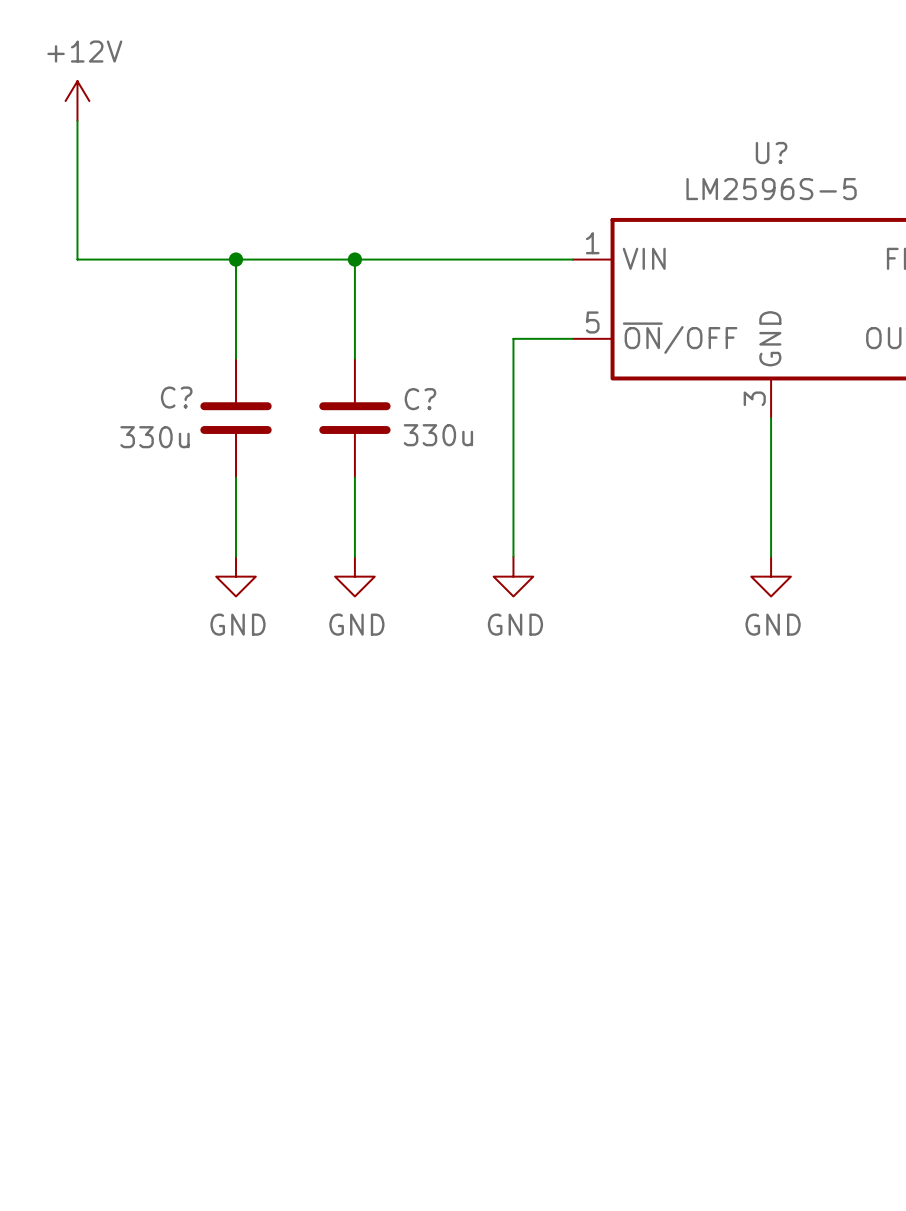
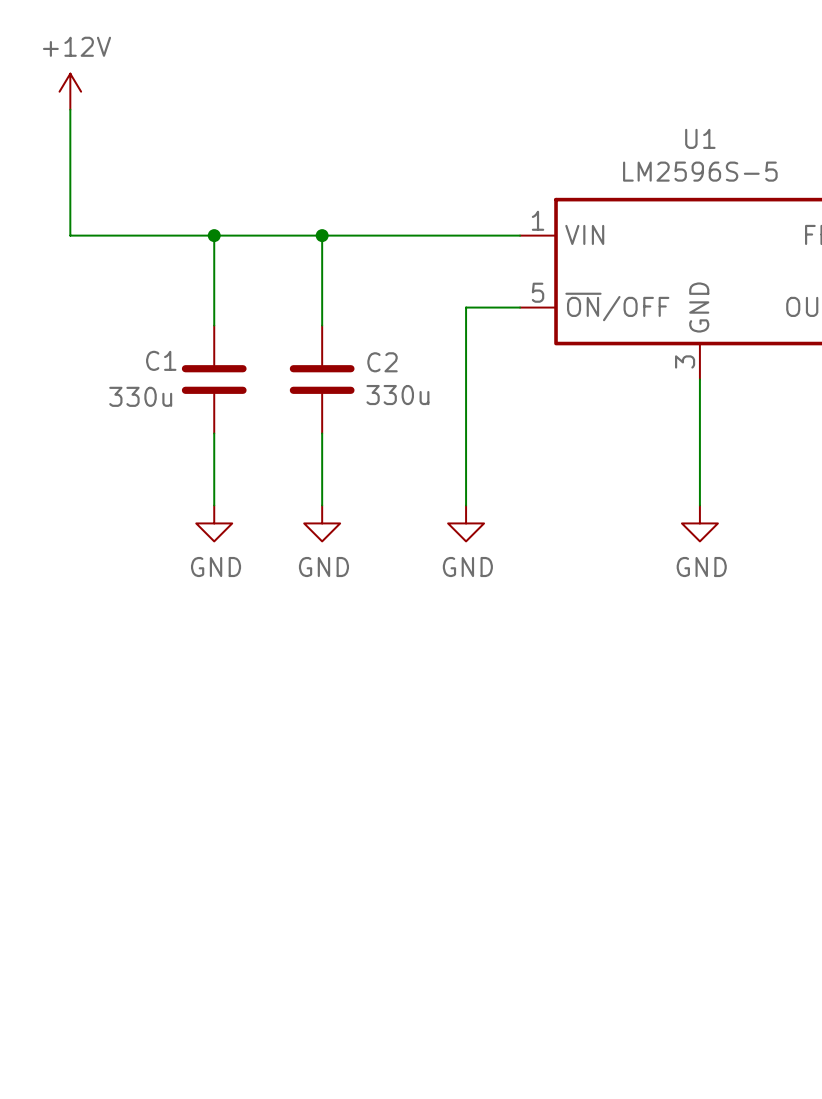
U? name: U? (771, 152) -> U1 (700, 138)
C? name: C? (176, 397) -> C1 (161, 360)
C? name: C? (420, 399) -> C2 (382, 362)

